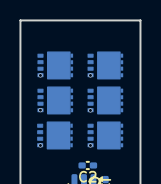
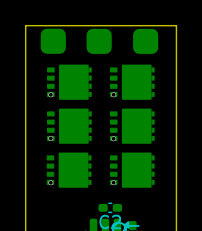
part: none -> (53, 41)
part: none -> (99, 41)
part: none -> (145, 41)

